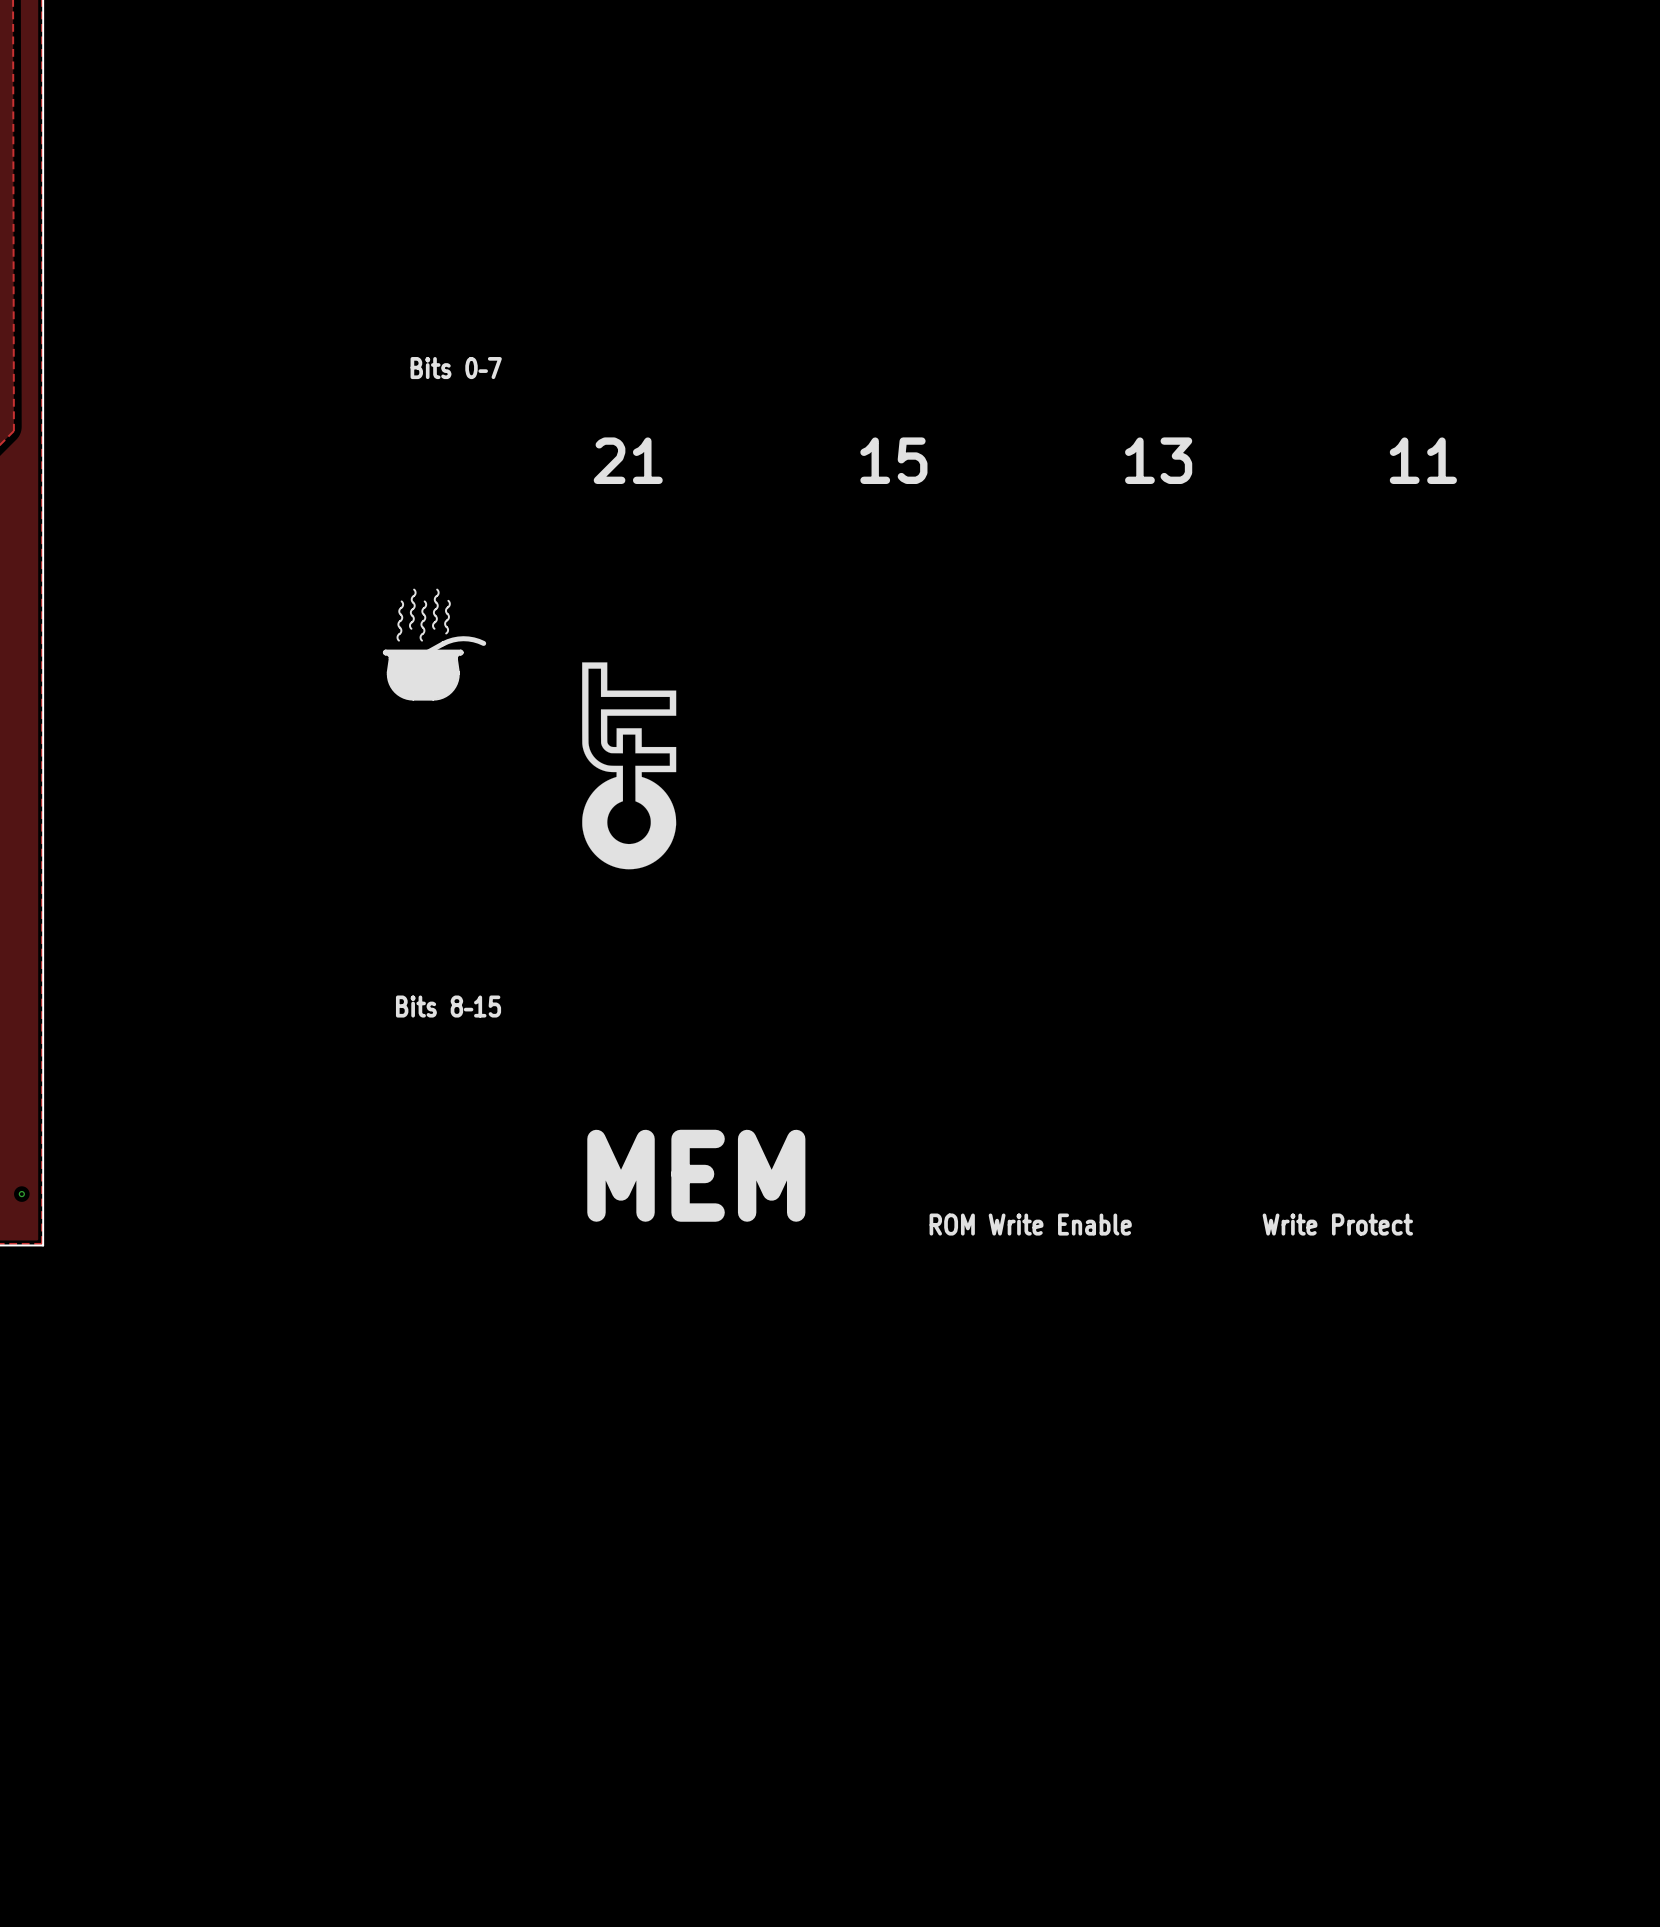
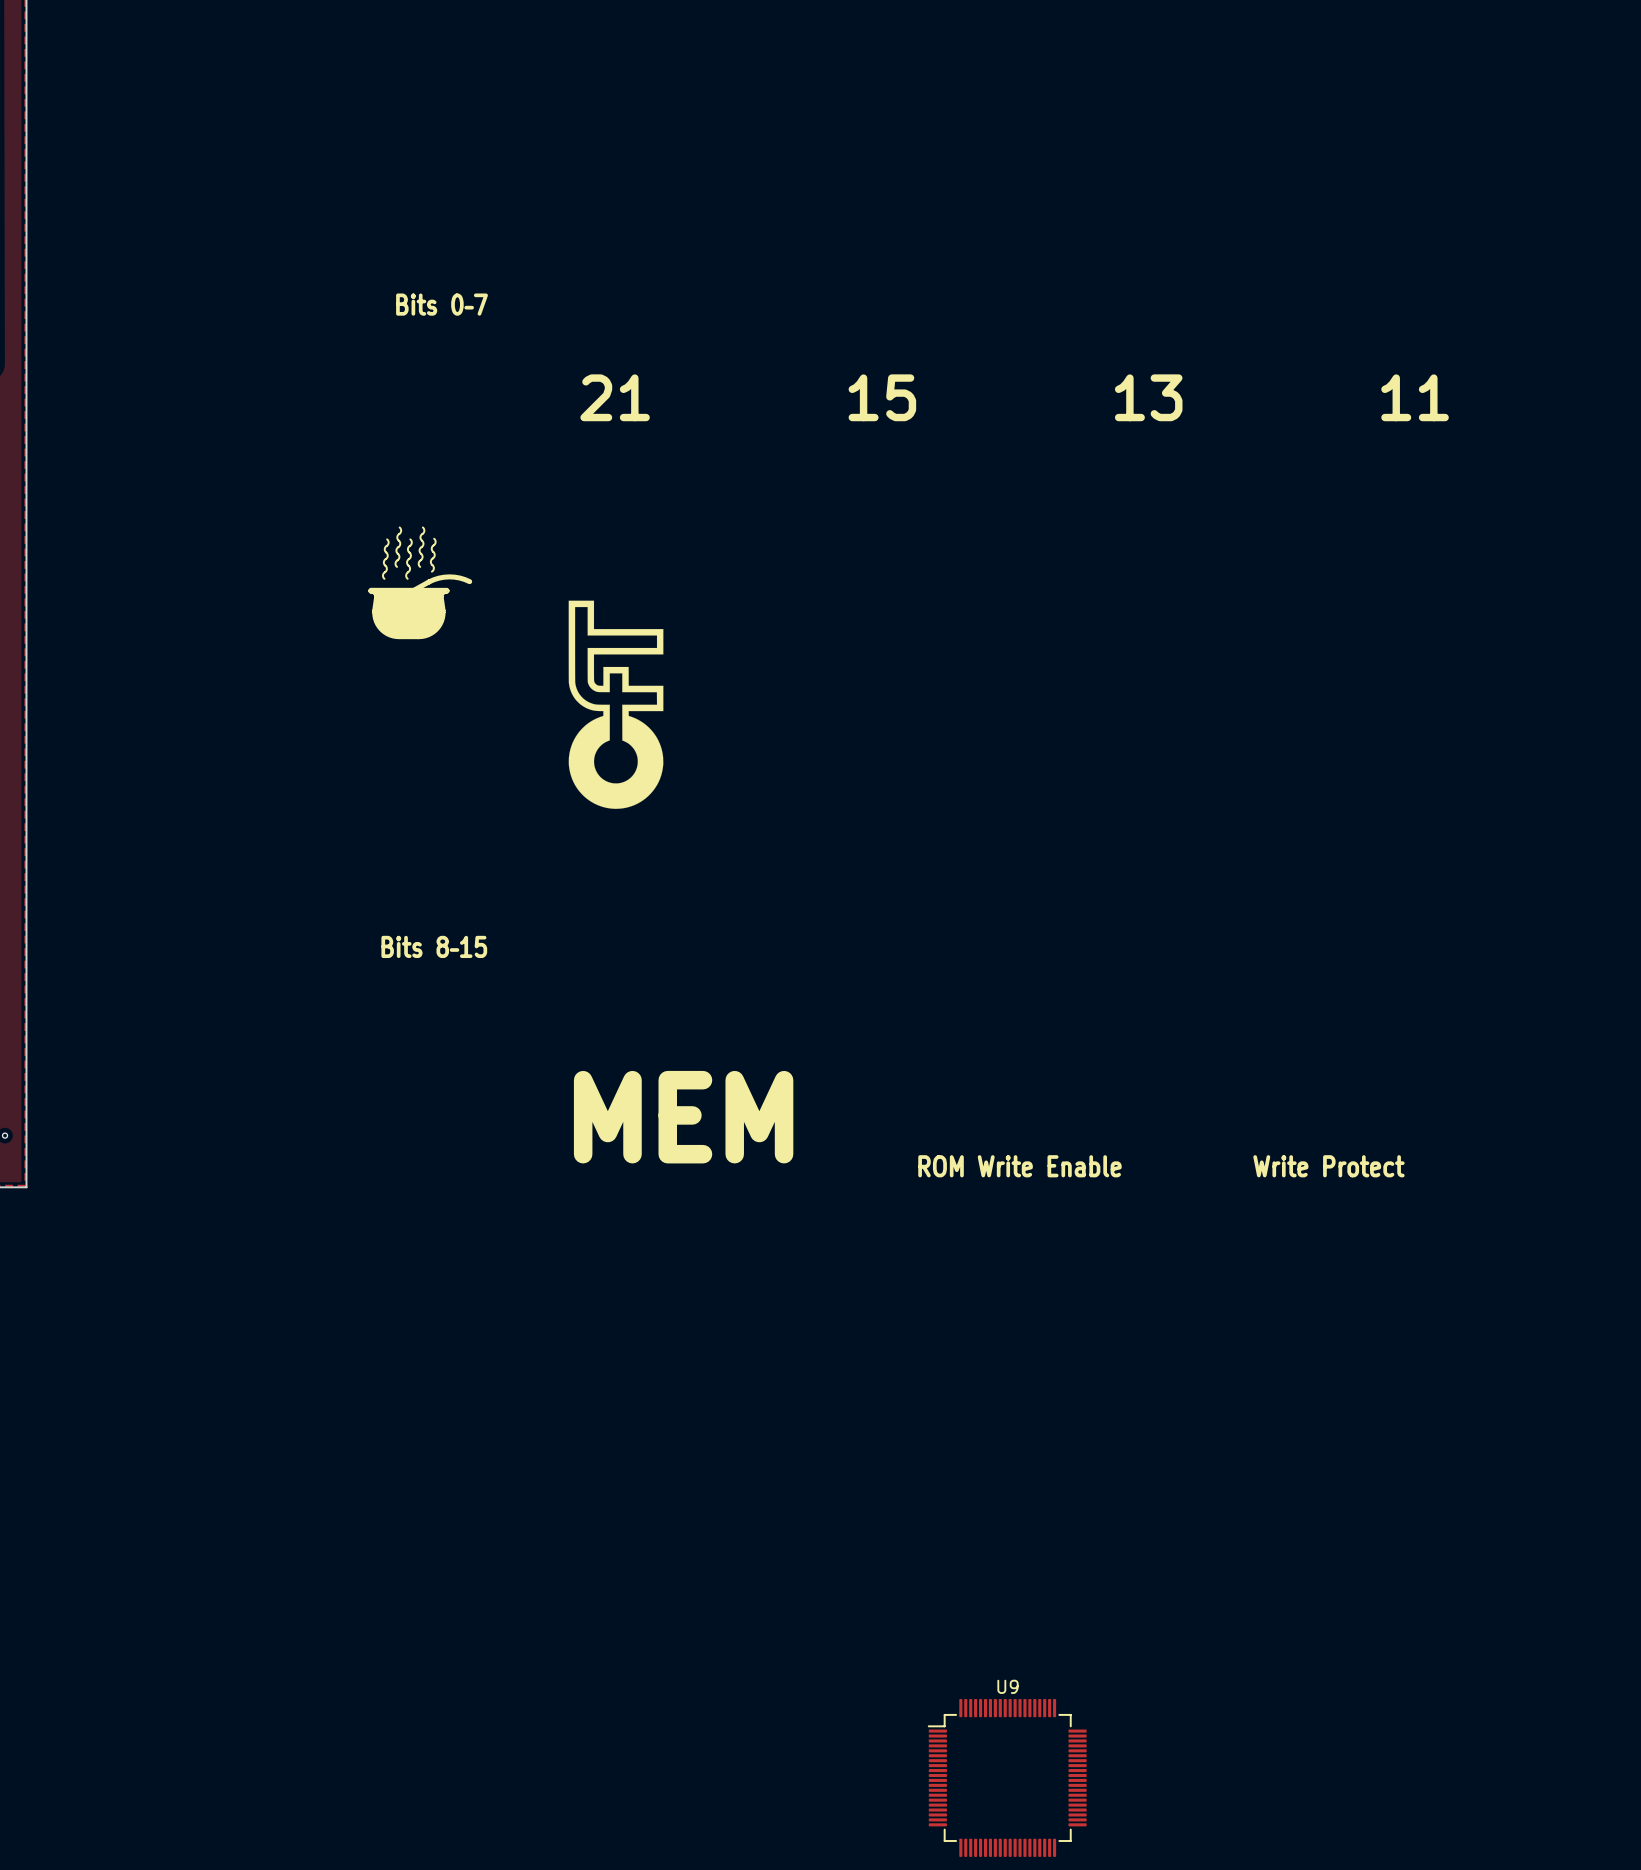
U9: none -> (1007, 1777)

